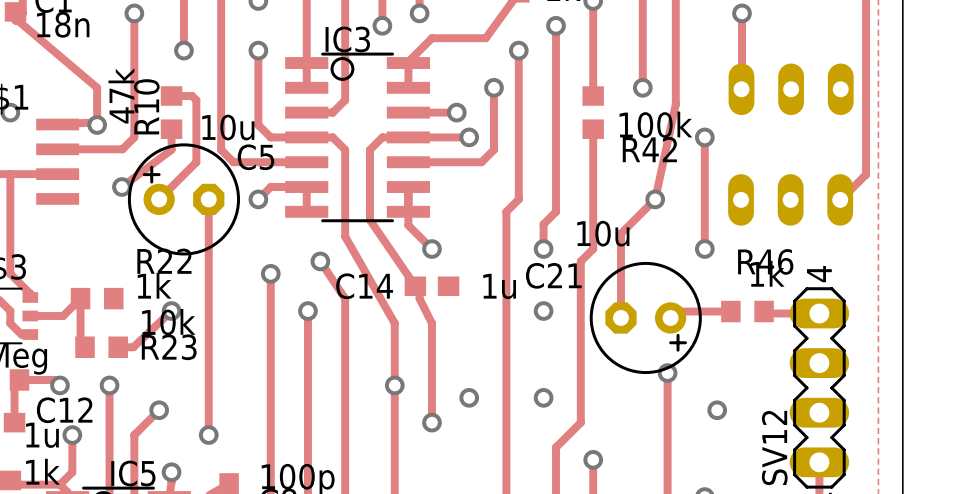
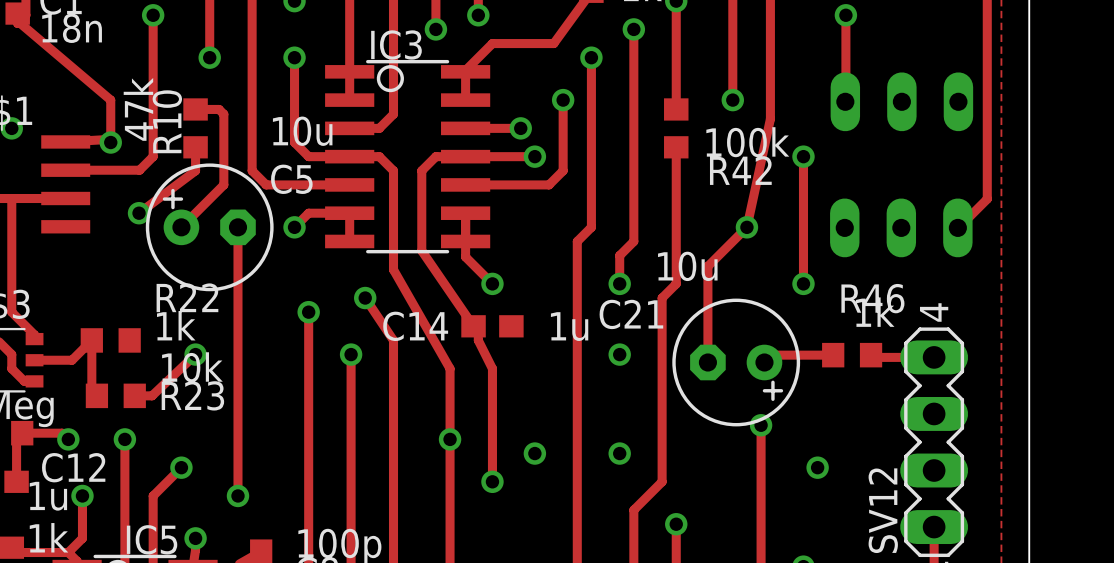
C5 value position: 10u (228, 127) -> 10u (302, 131)

